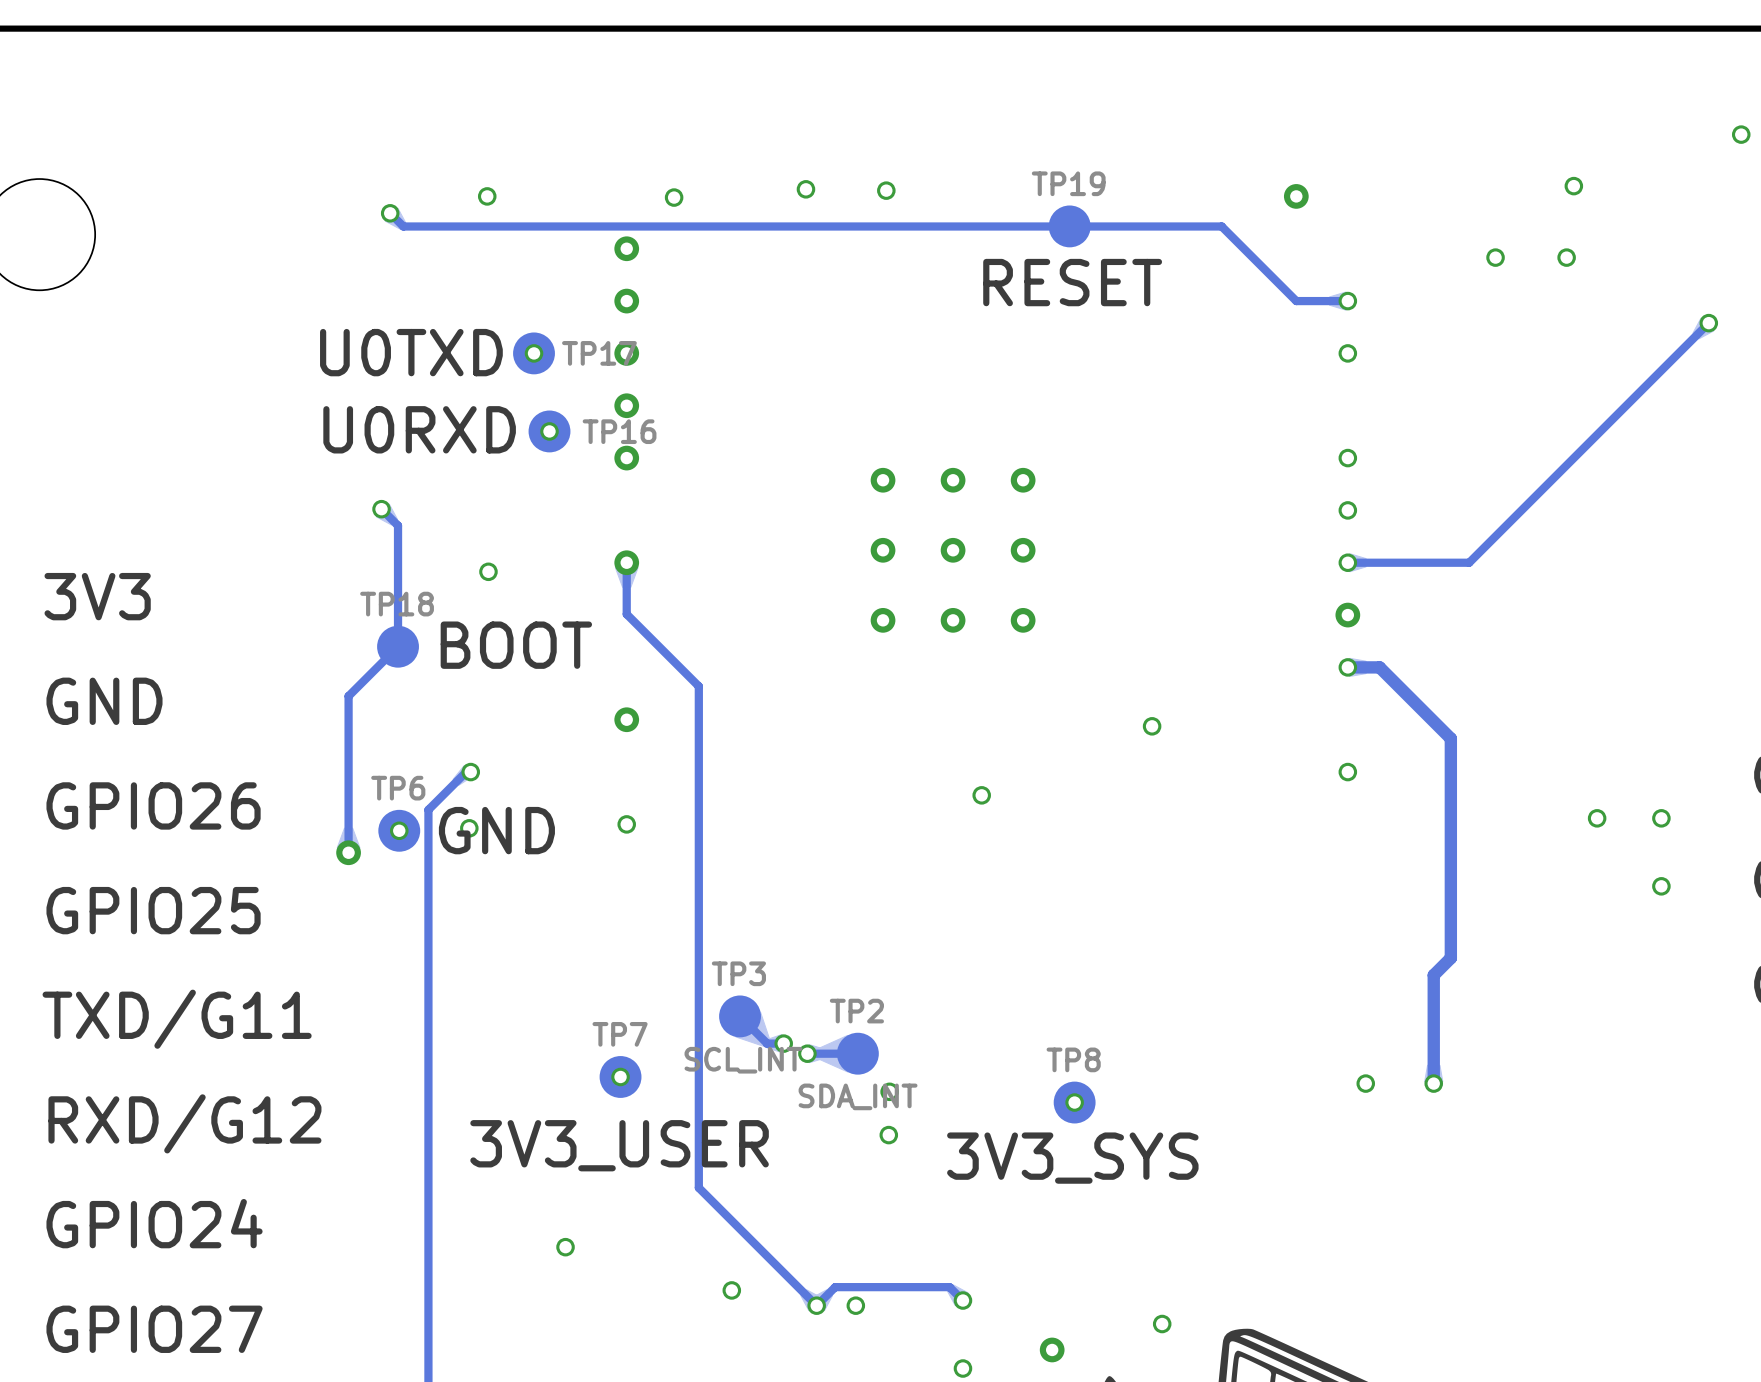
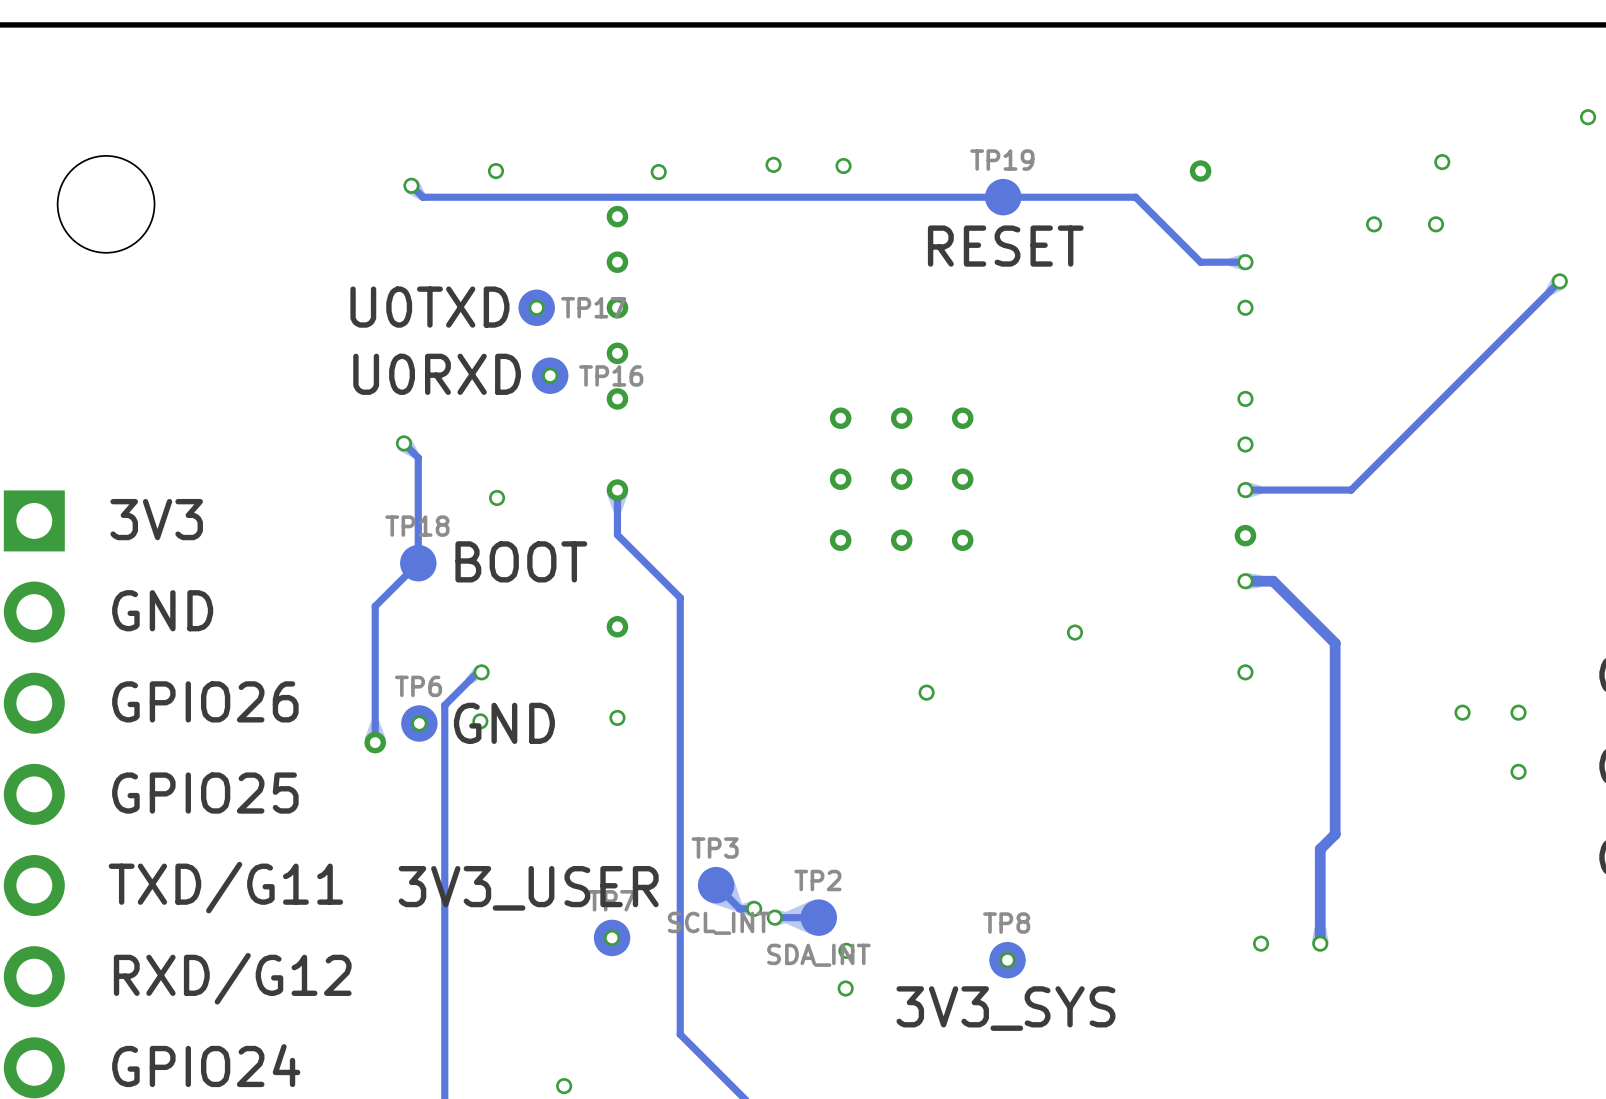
TP7 value position: 3V3_USER (619, 1145) -> 3V3_USER (528, 888)

